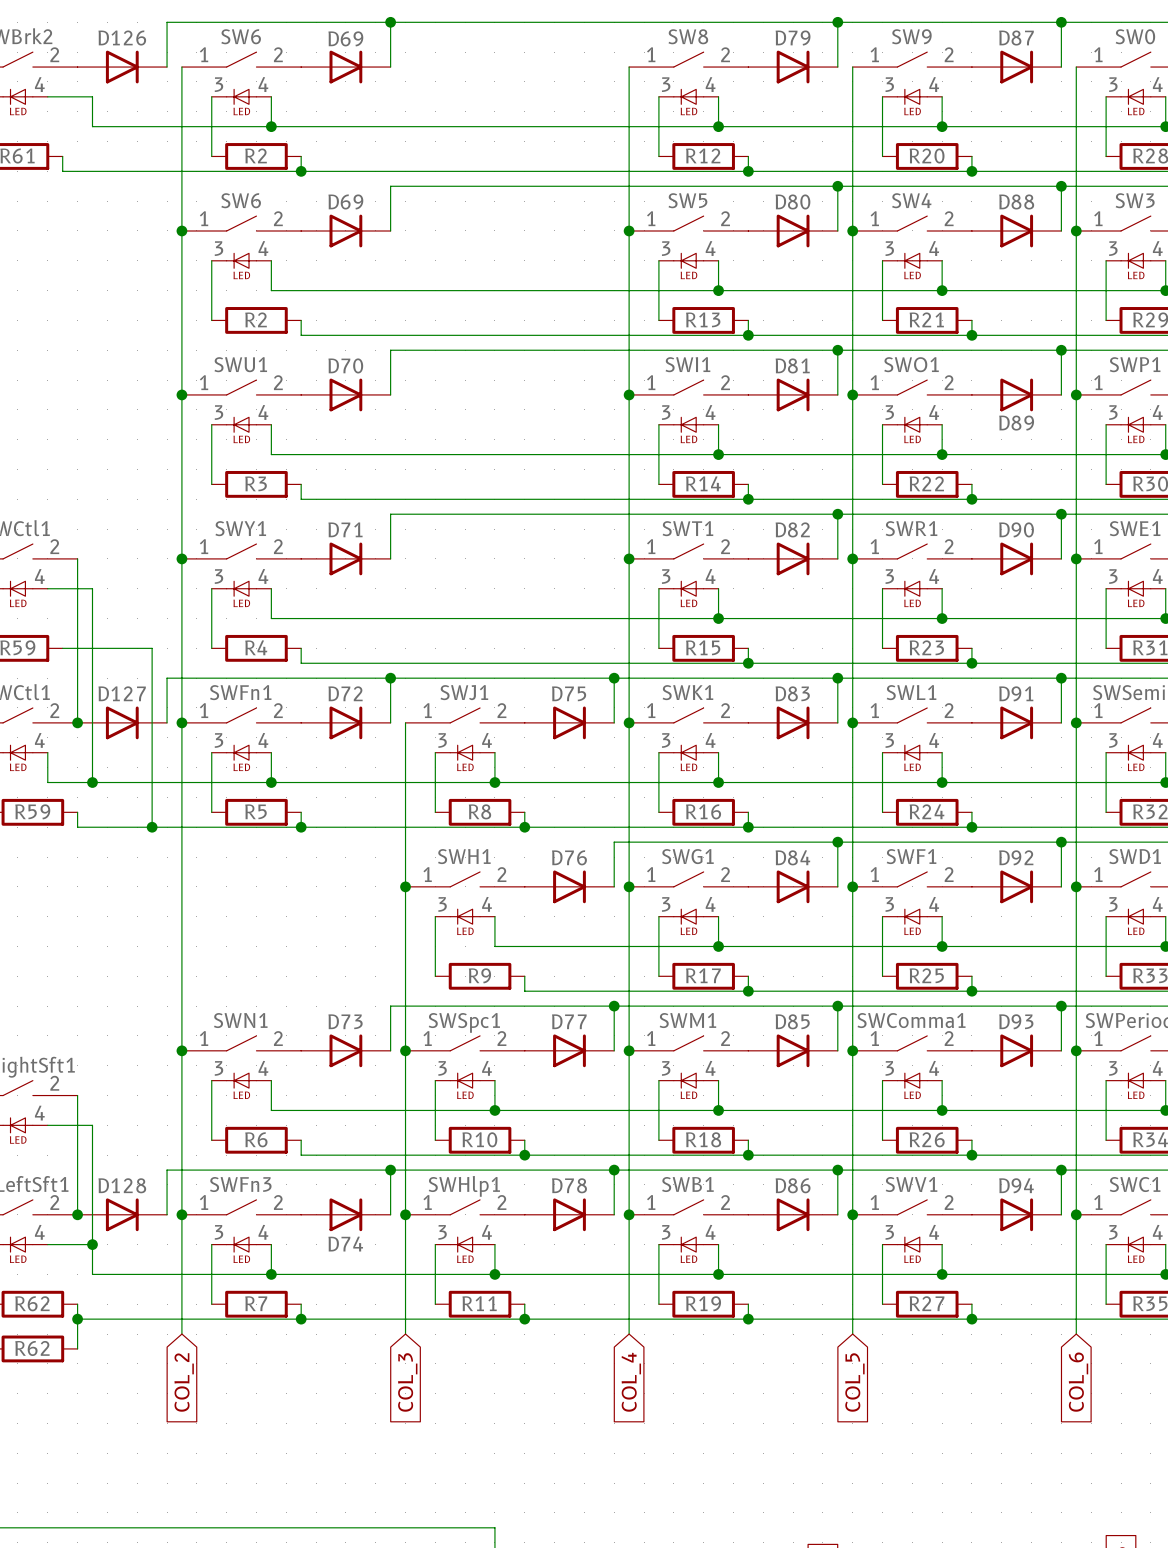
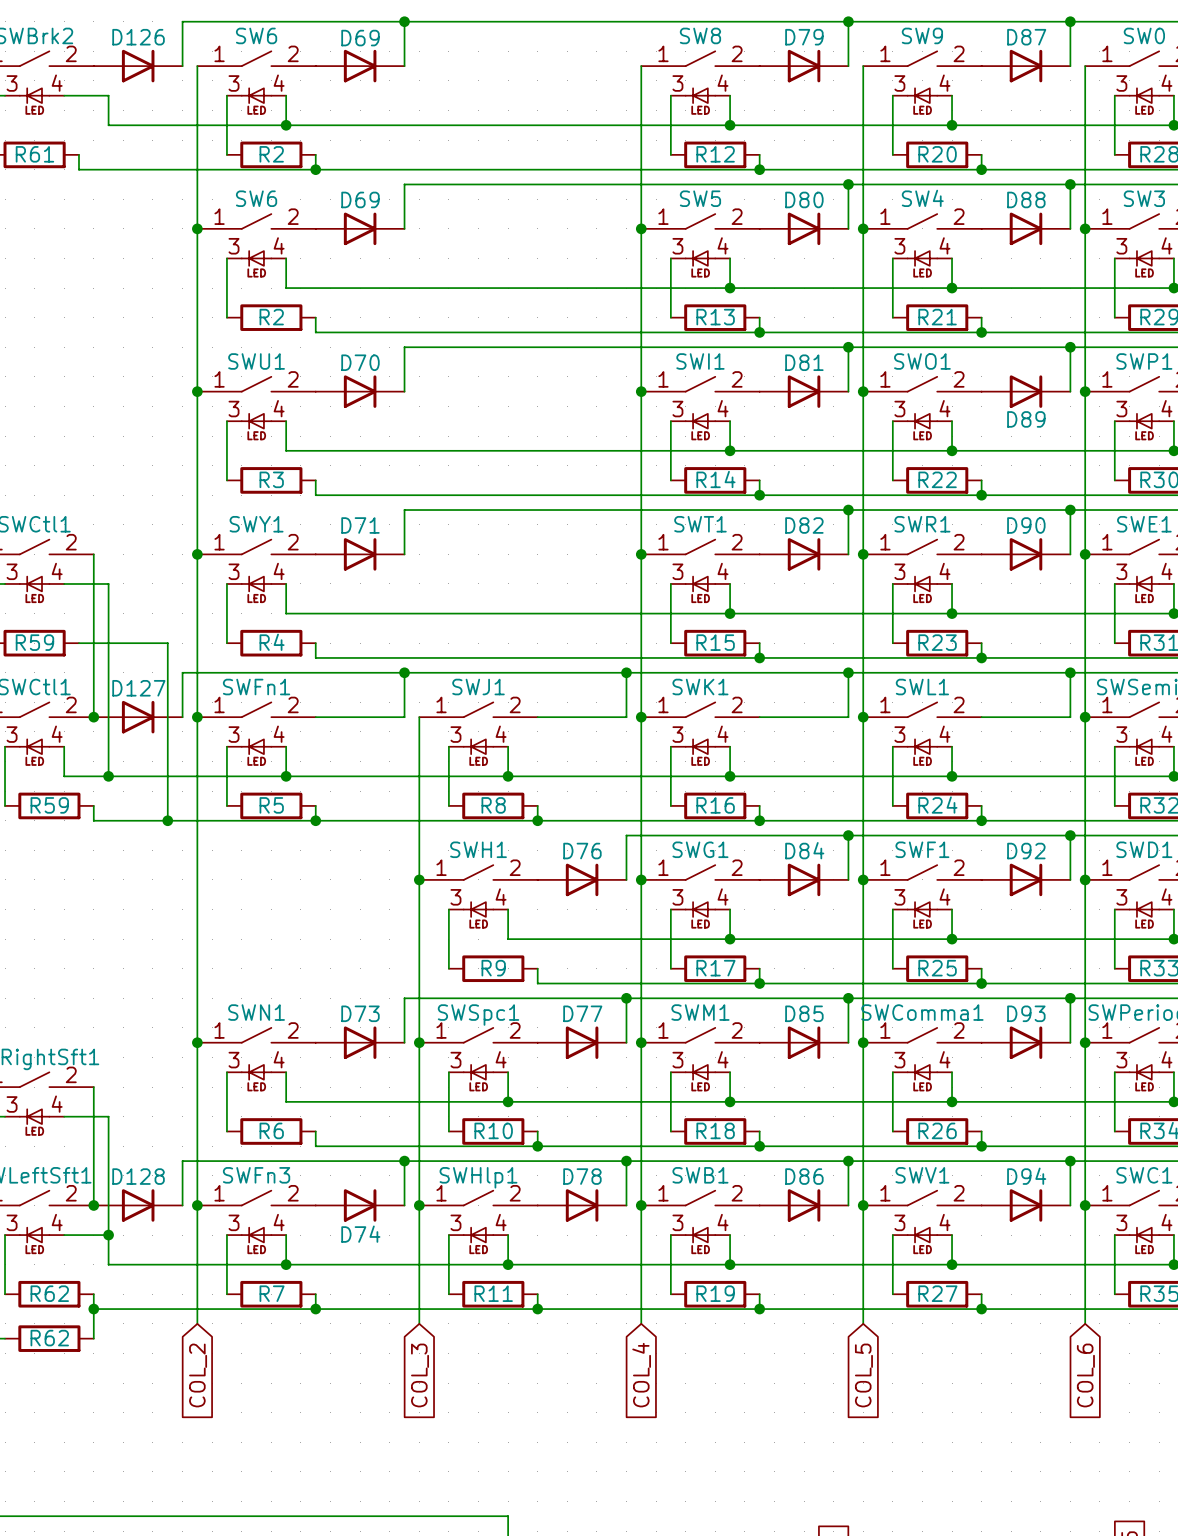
D72: (345, 722) -> none
D75: (569, 722) -> none
D83: (793, 722) -> none
D91: (1016, 722) -> none

